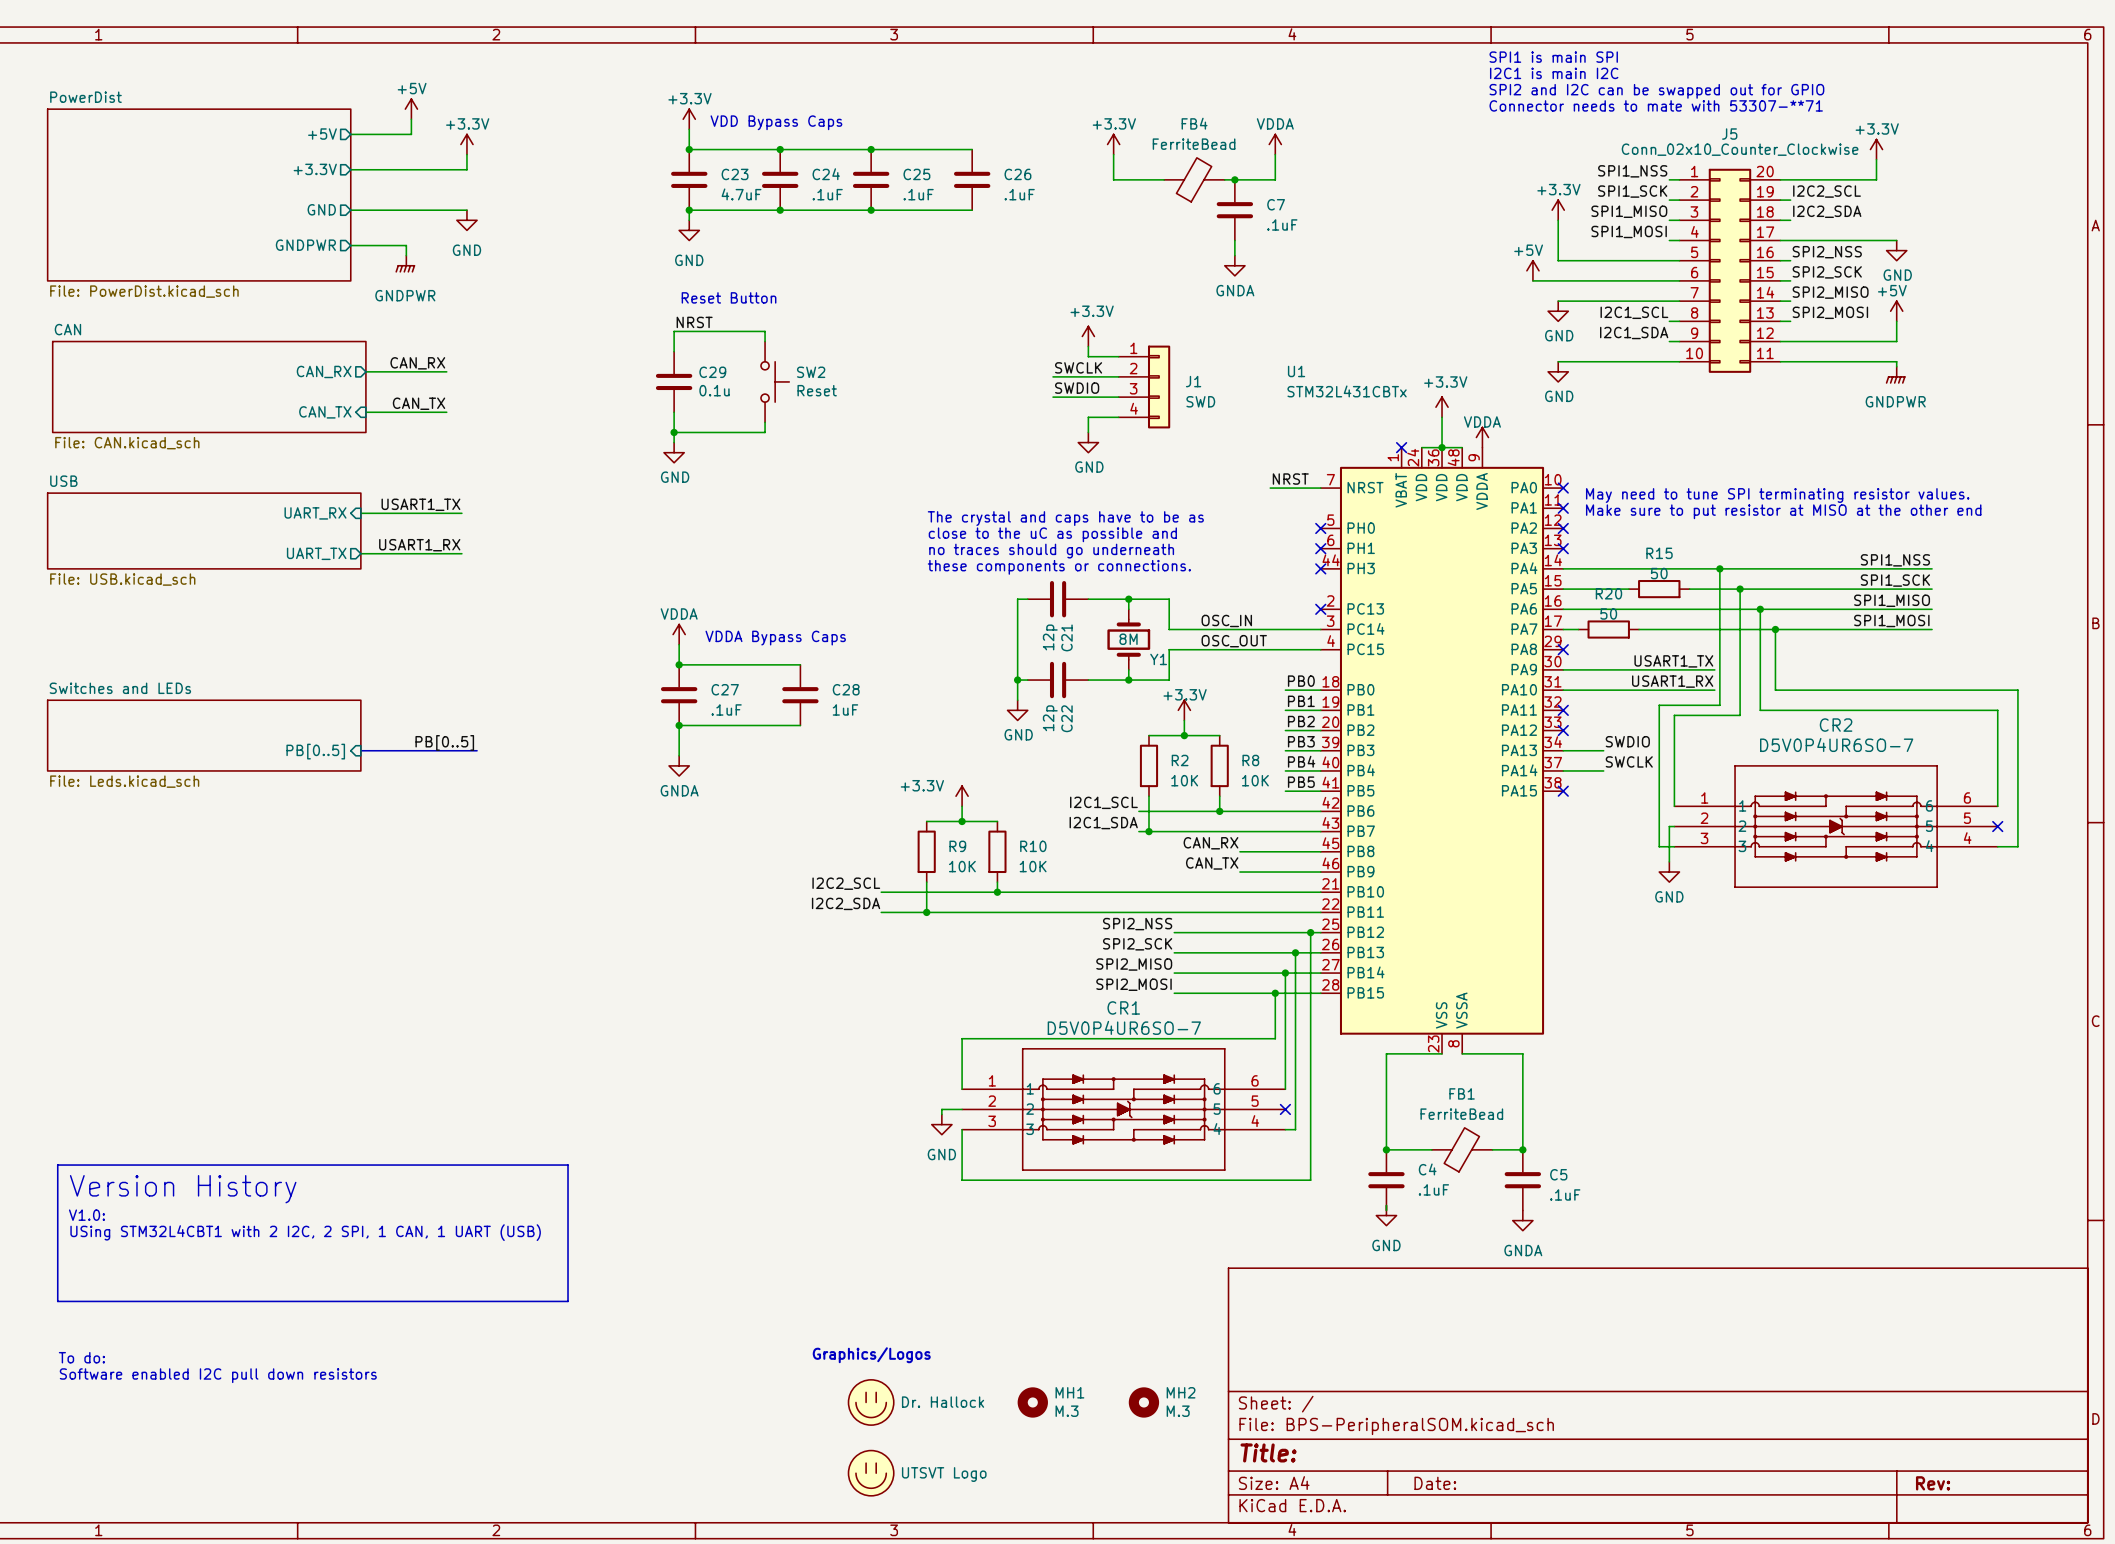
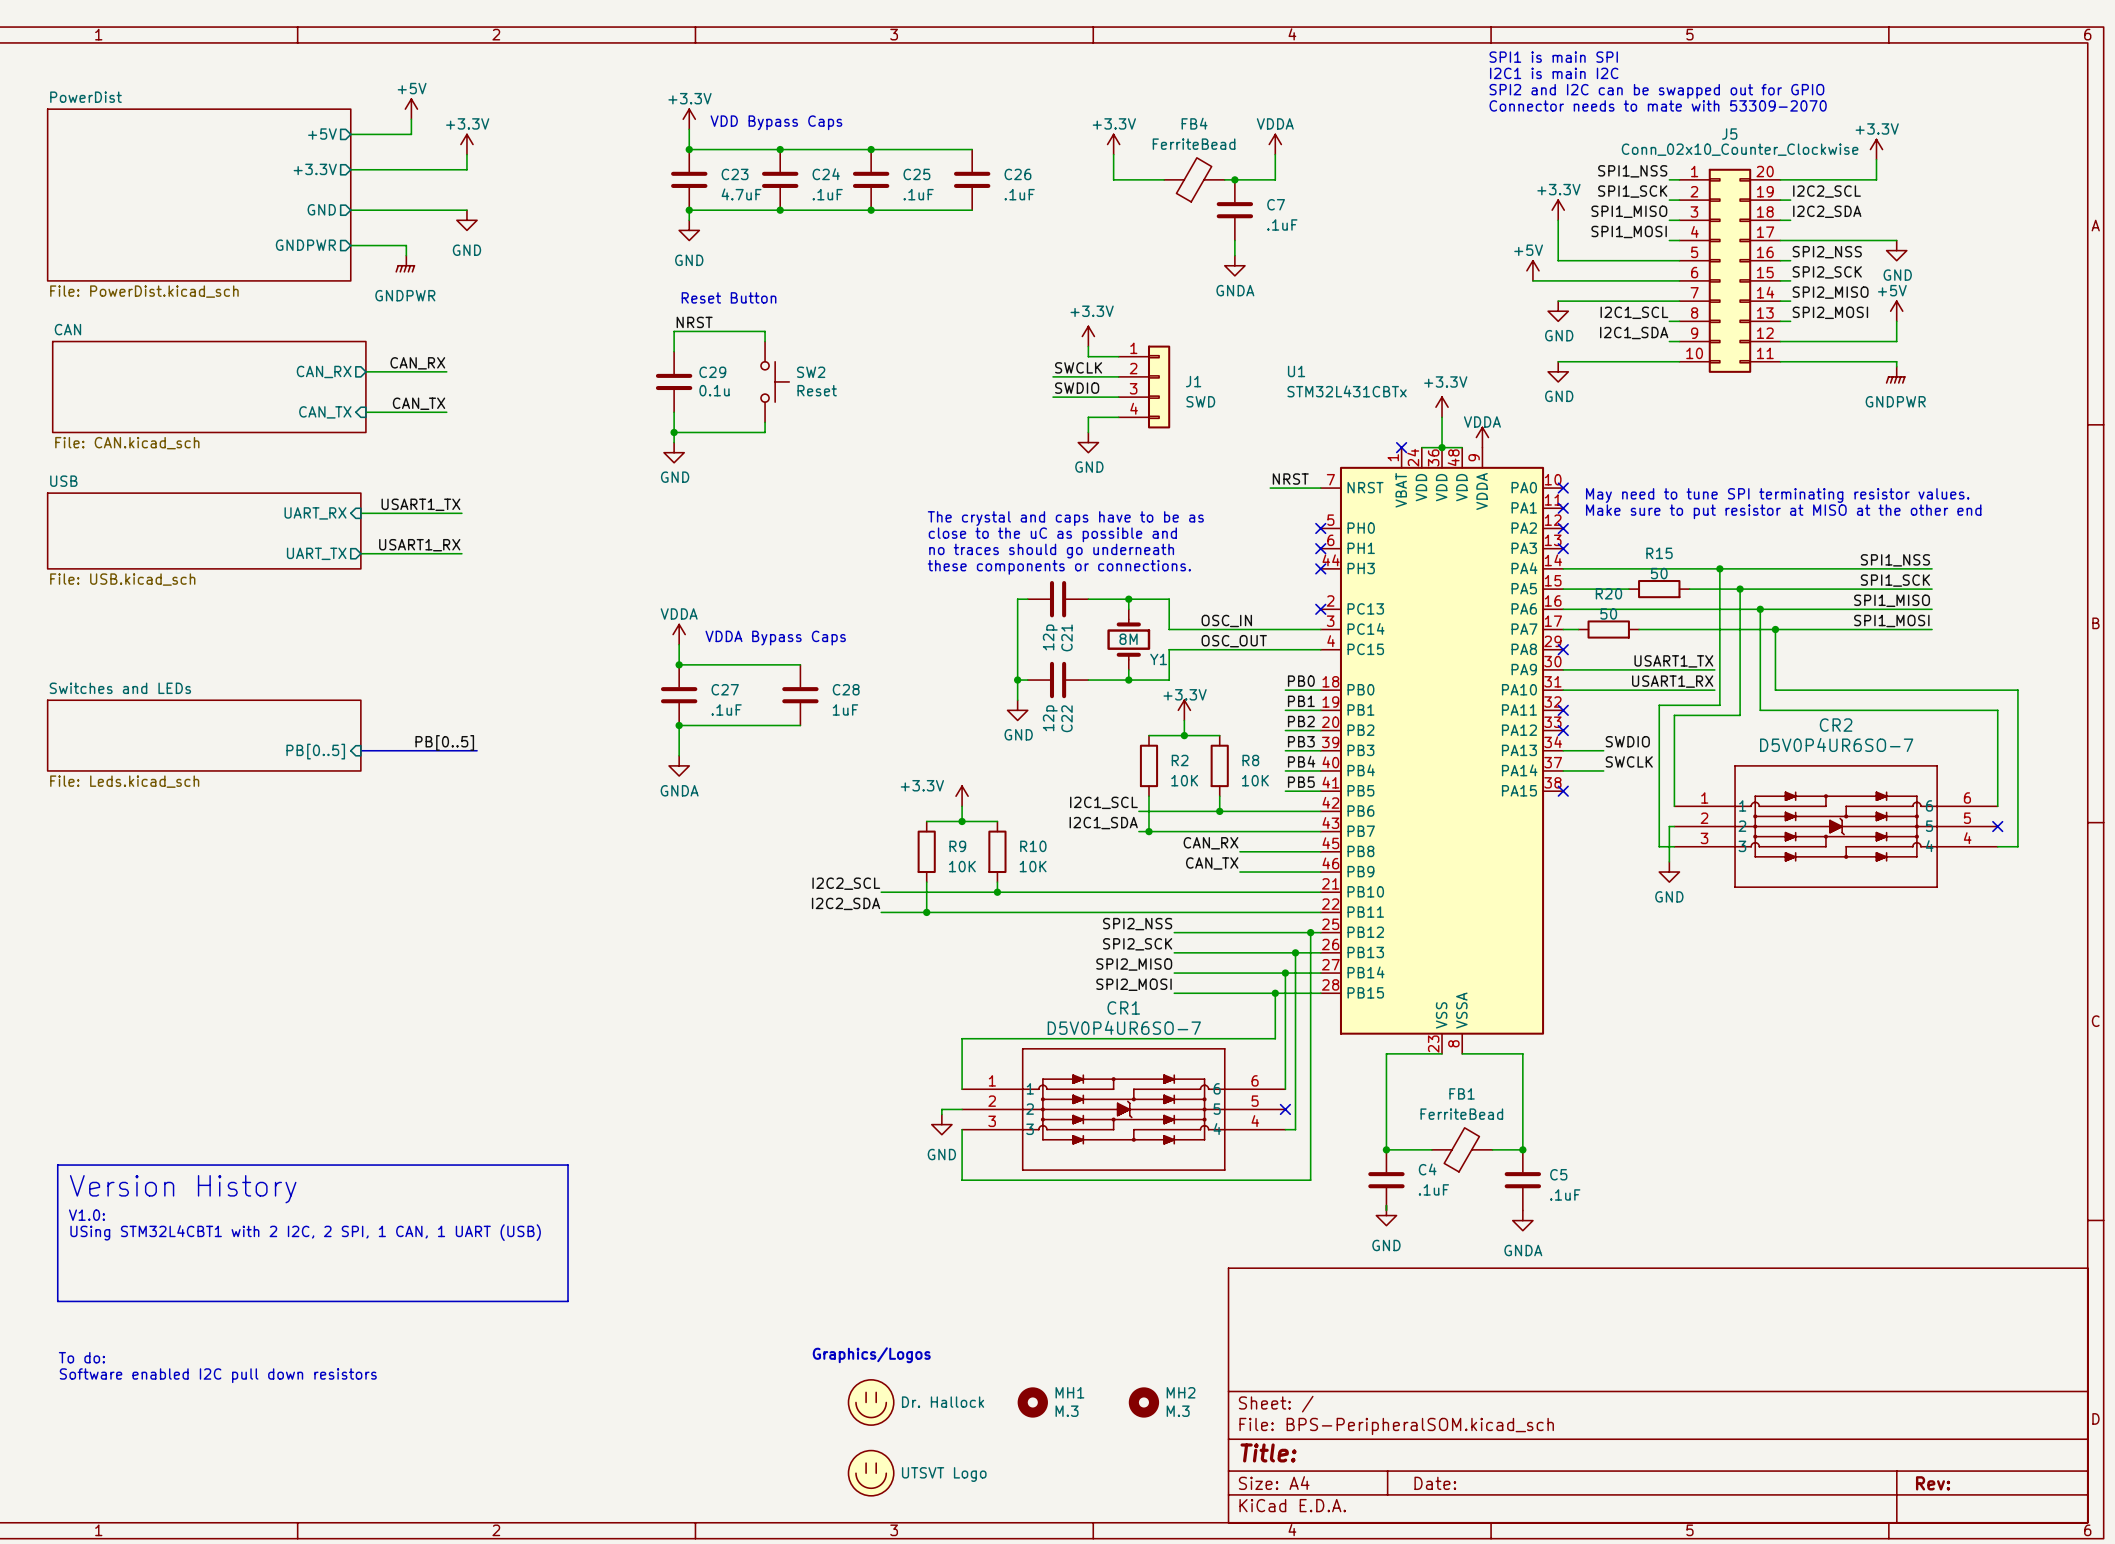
text: Connector needs to mate with 53307-**71 (1656, 105) -> Connector needs to mate with 53309-2070 (1658, 105)

